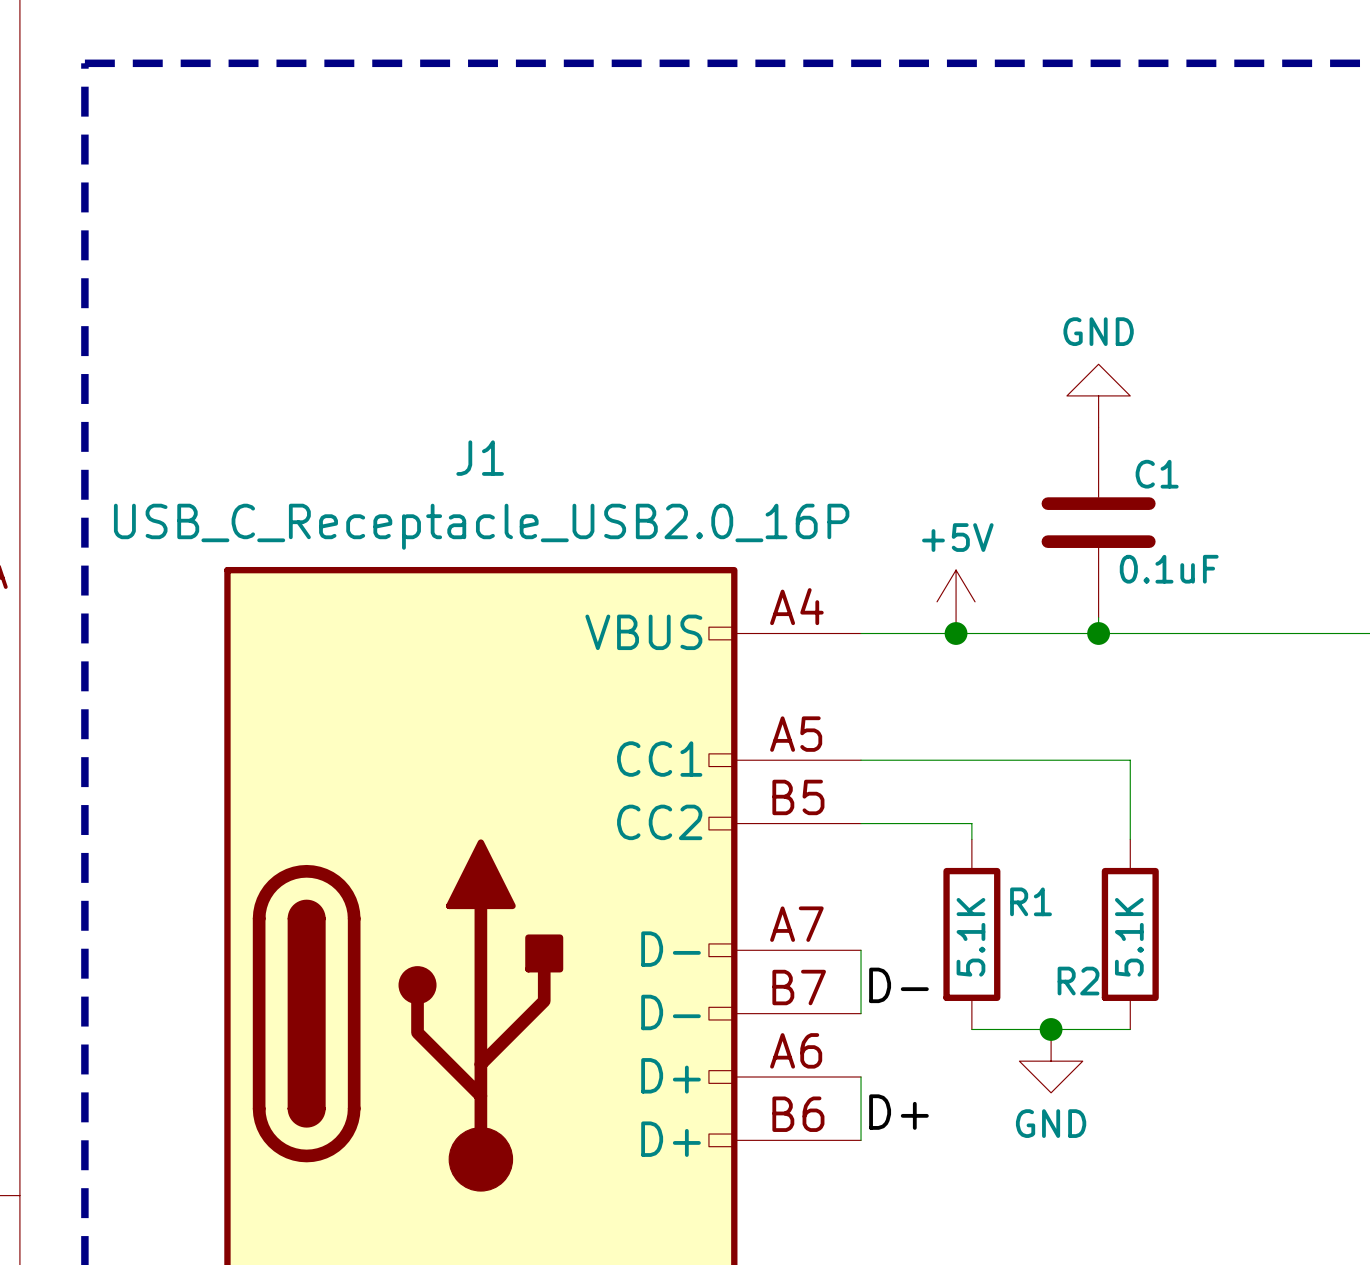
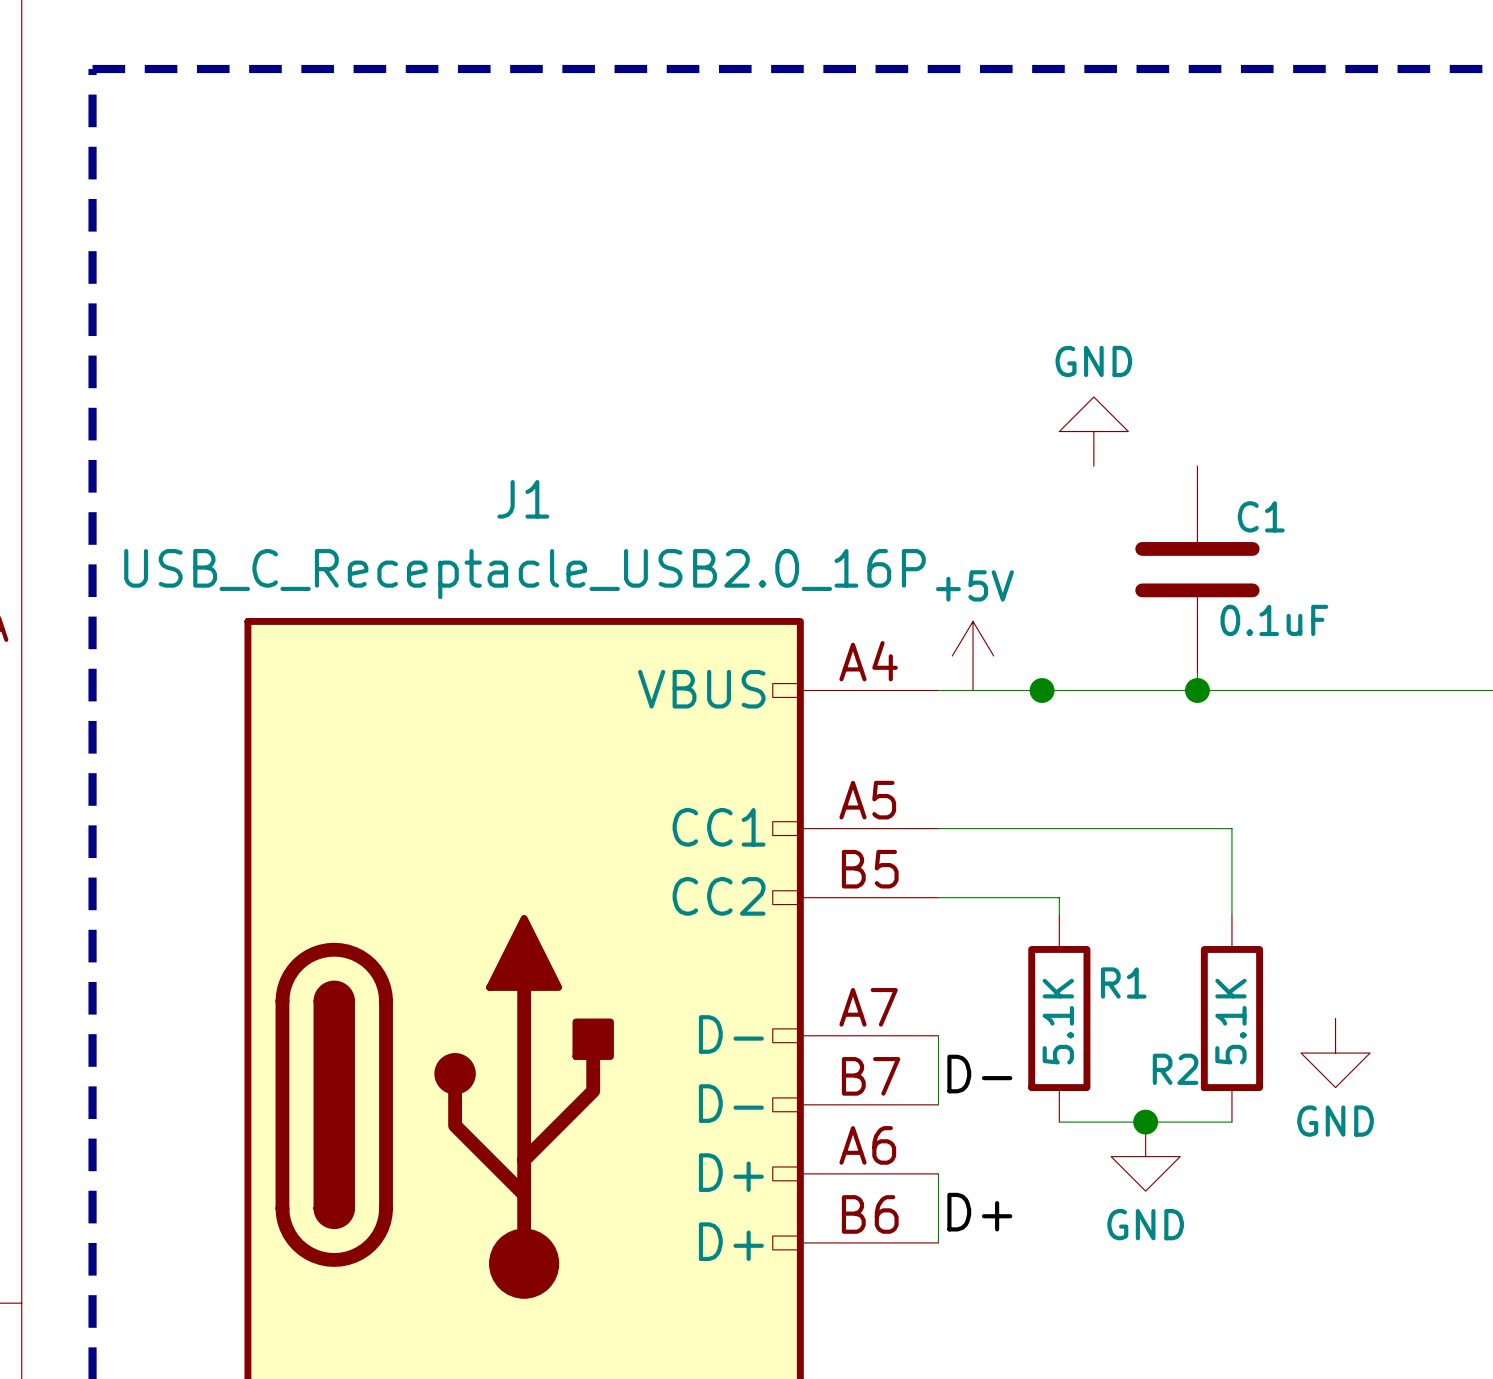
power symbol position: GND (1098, 395) -> GND (1093, 431)
power symbol position: +5V (956, 601) -> +5V (973, 655)
power symbol: none -> GND (1335, 1053)

